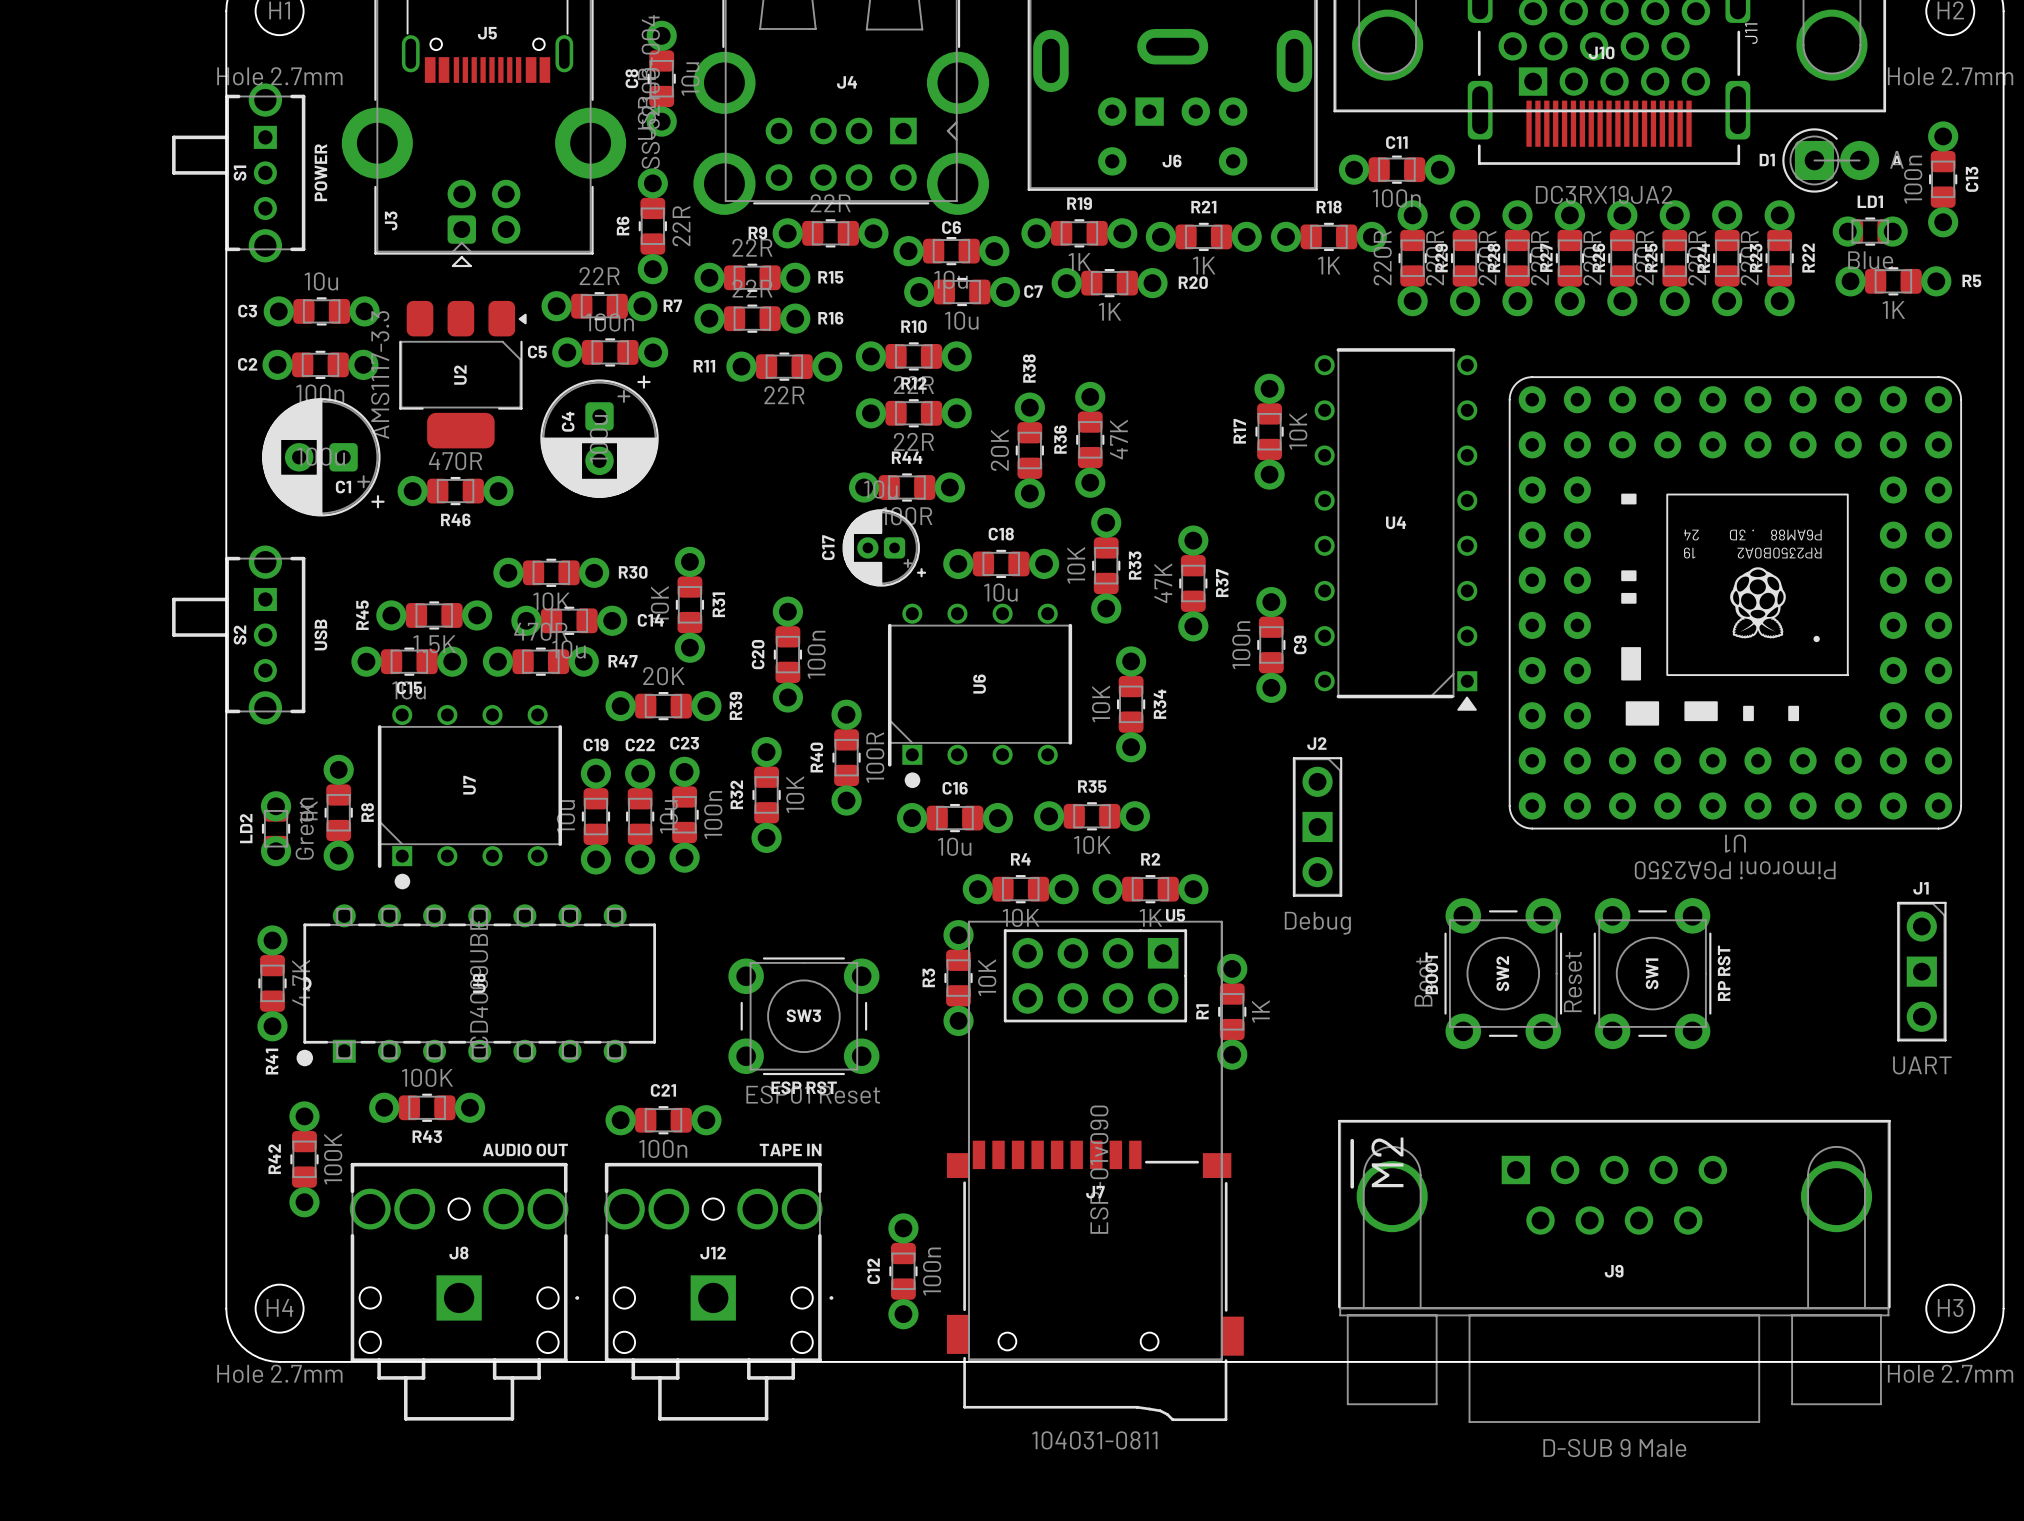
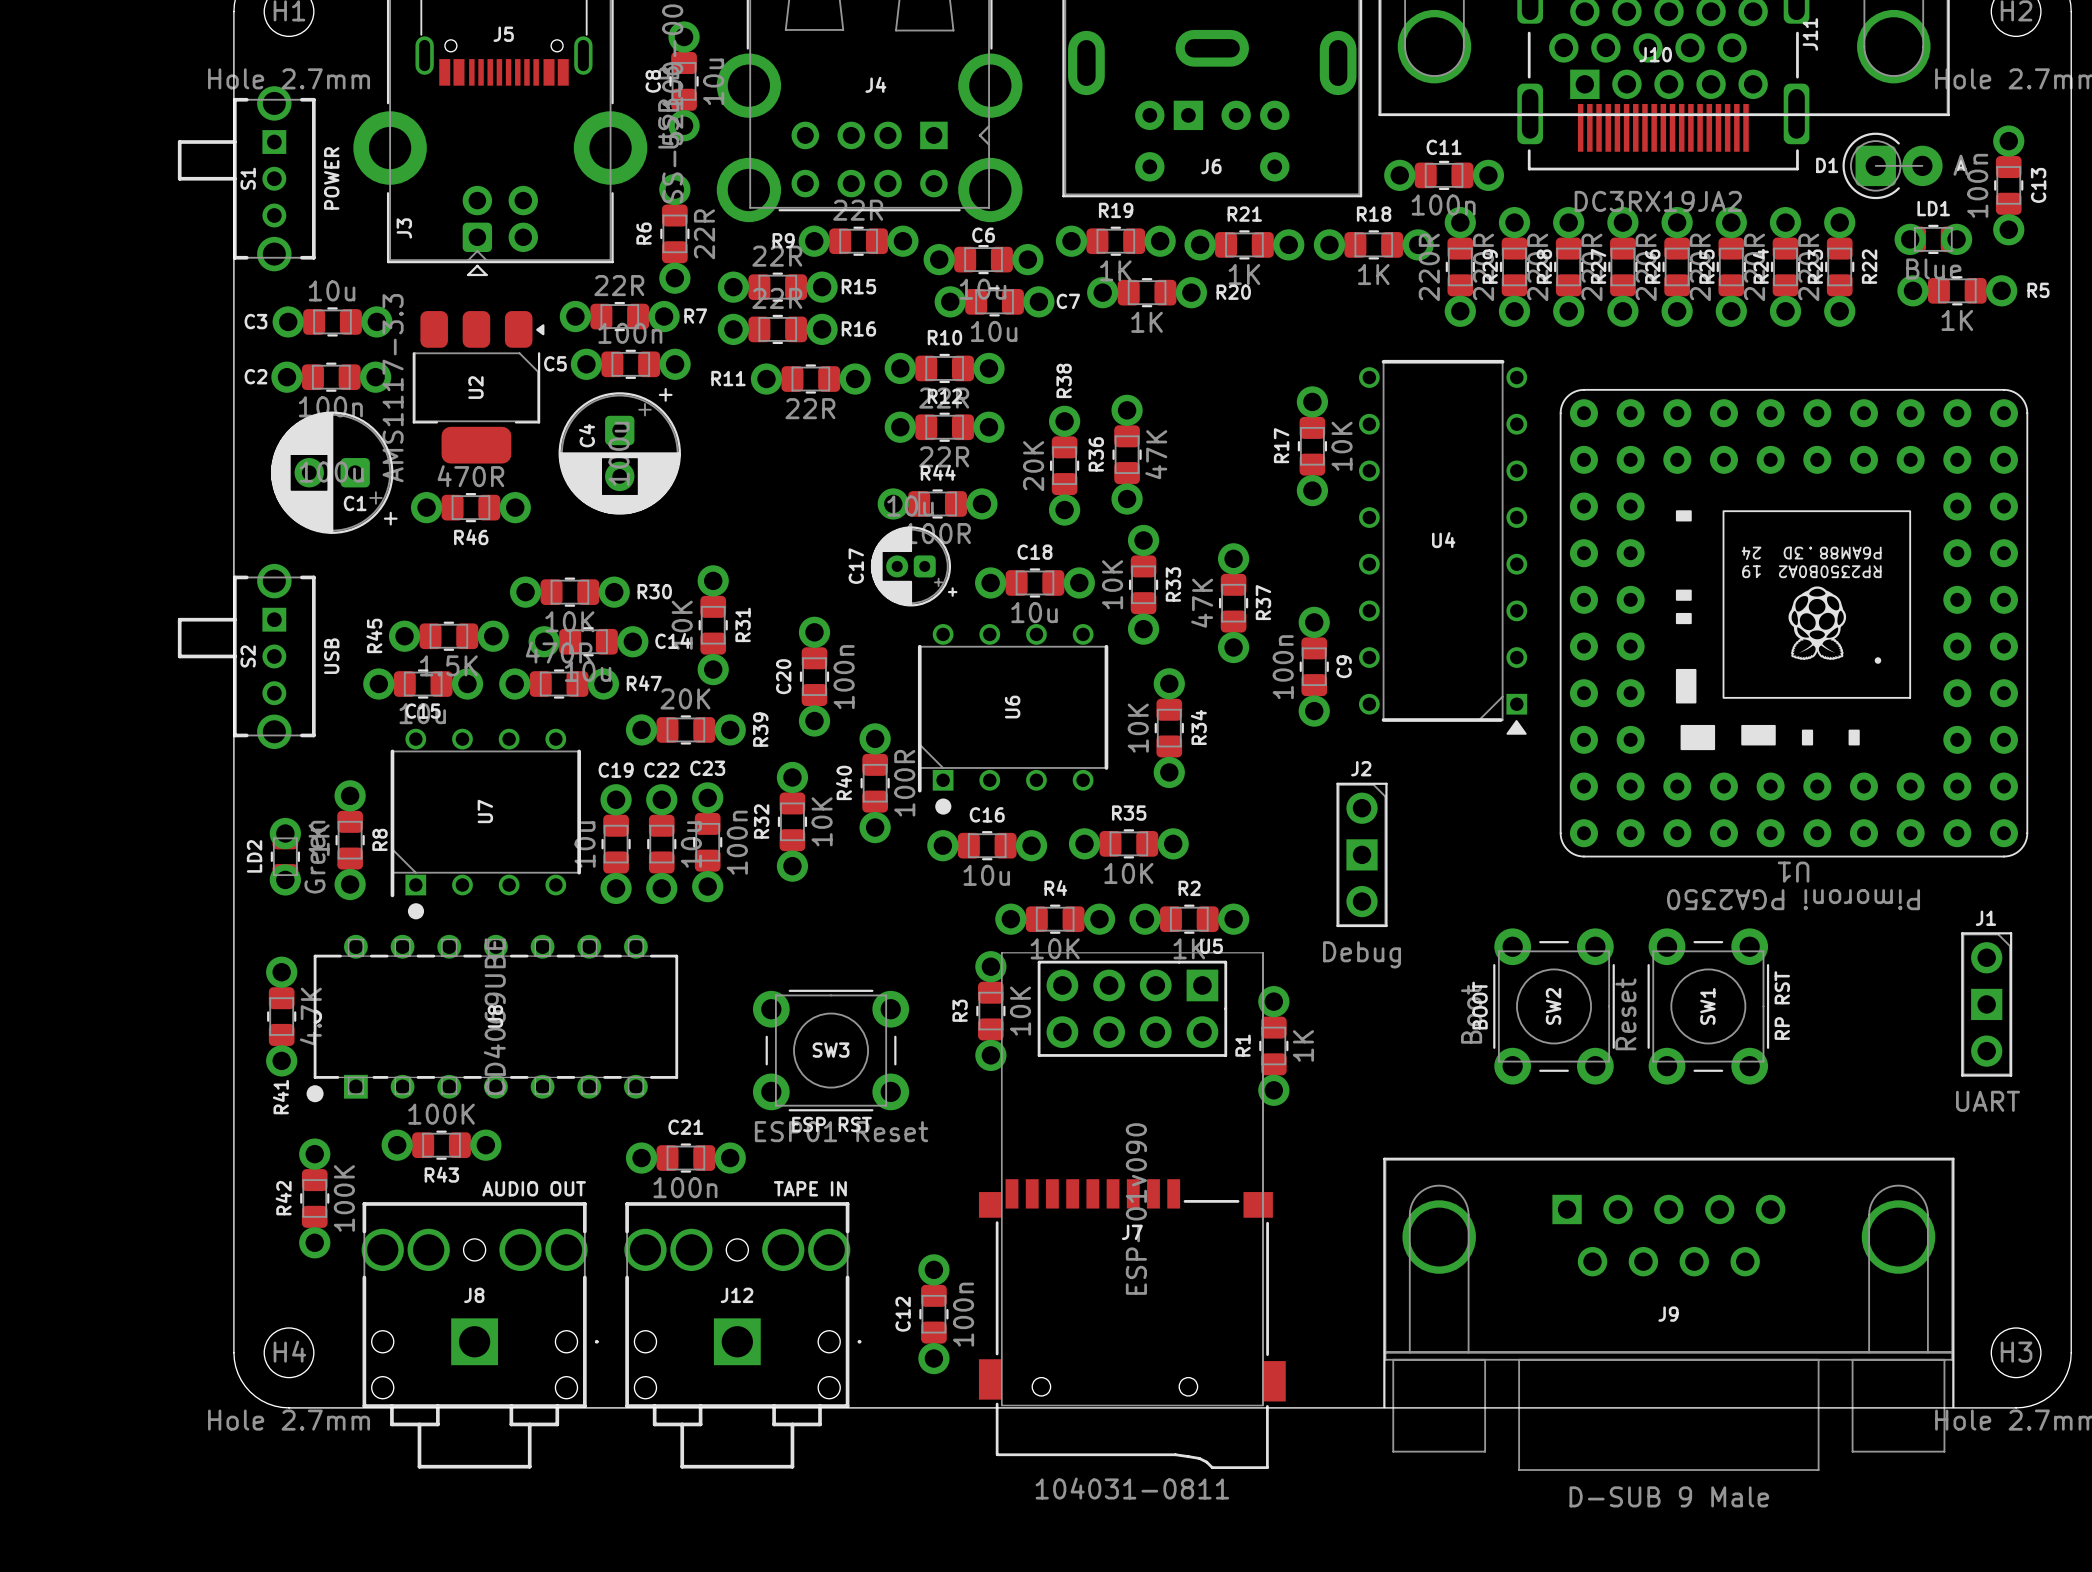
J9 footprint: [1338, 1119, 1891, 1423] -> [1383, 1157, 1955, 1471]
line: (1352, 1140) (1352, 1186) -> none
text: M2 (1387, 1162) -> none

